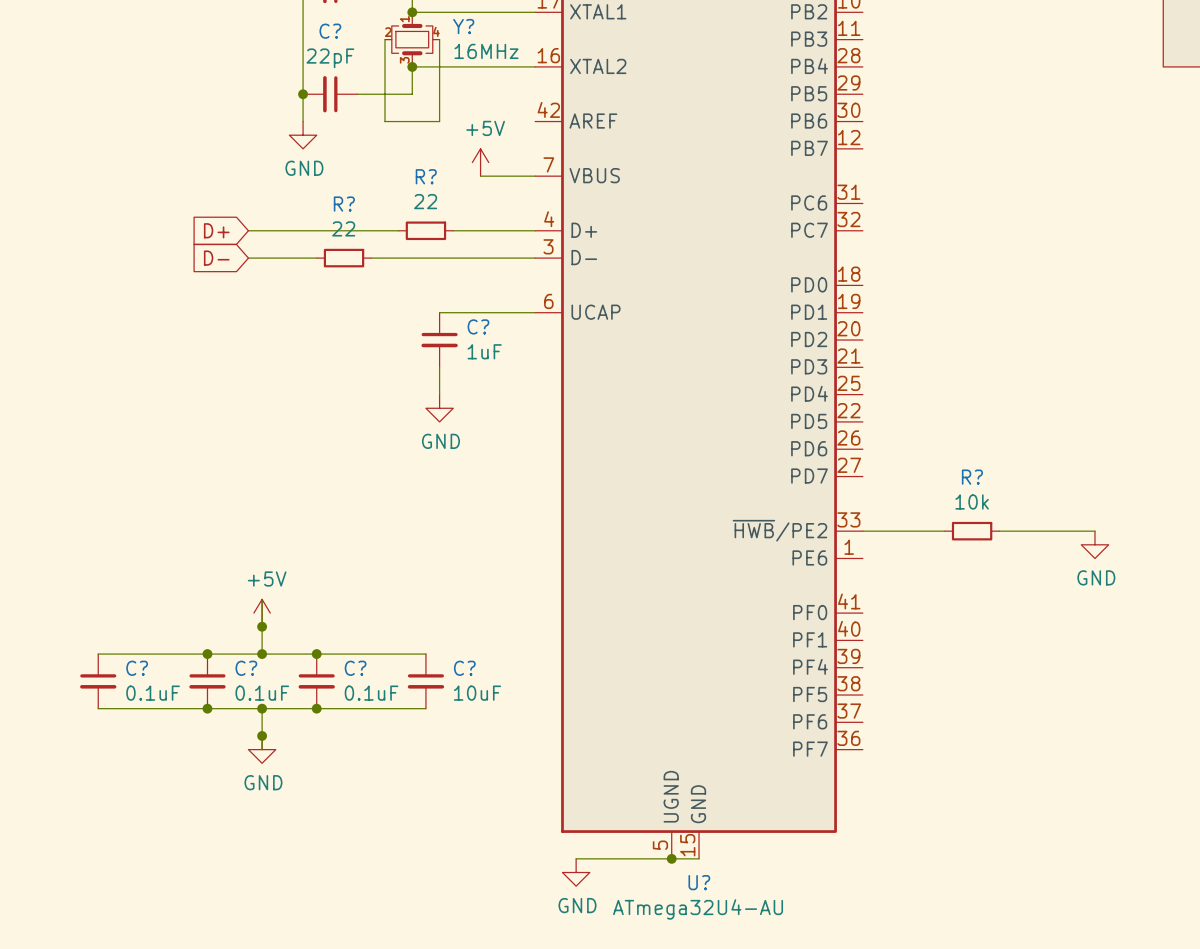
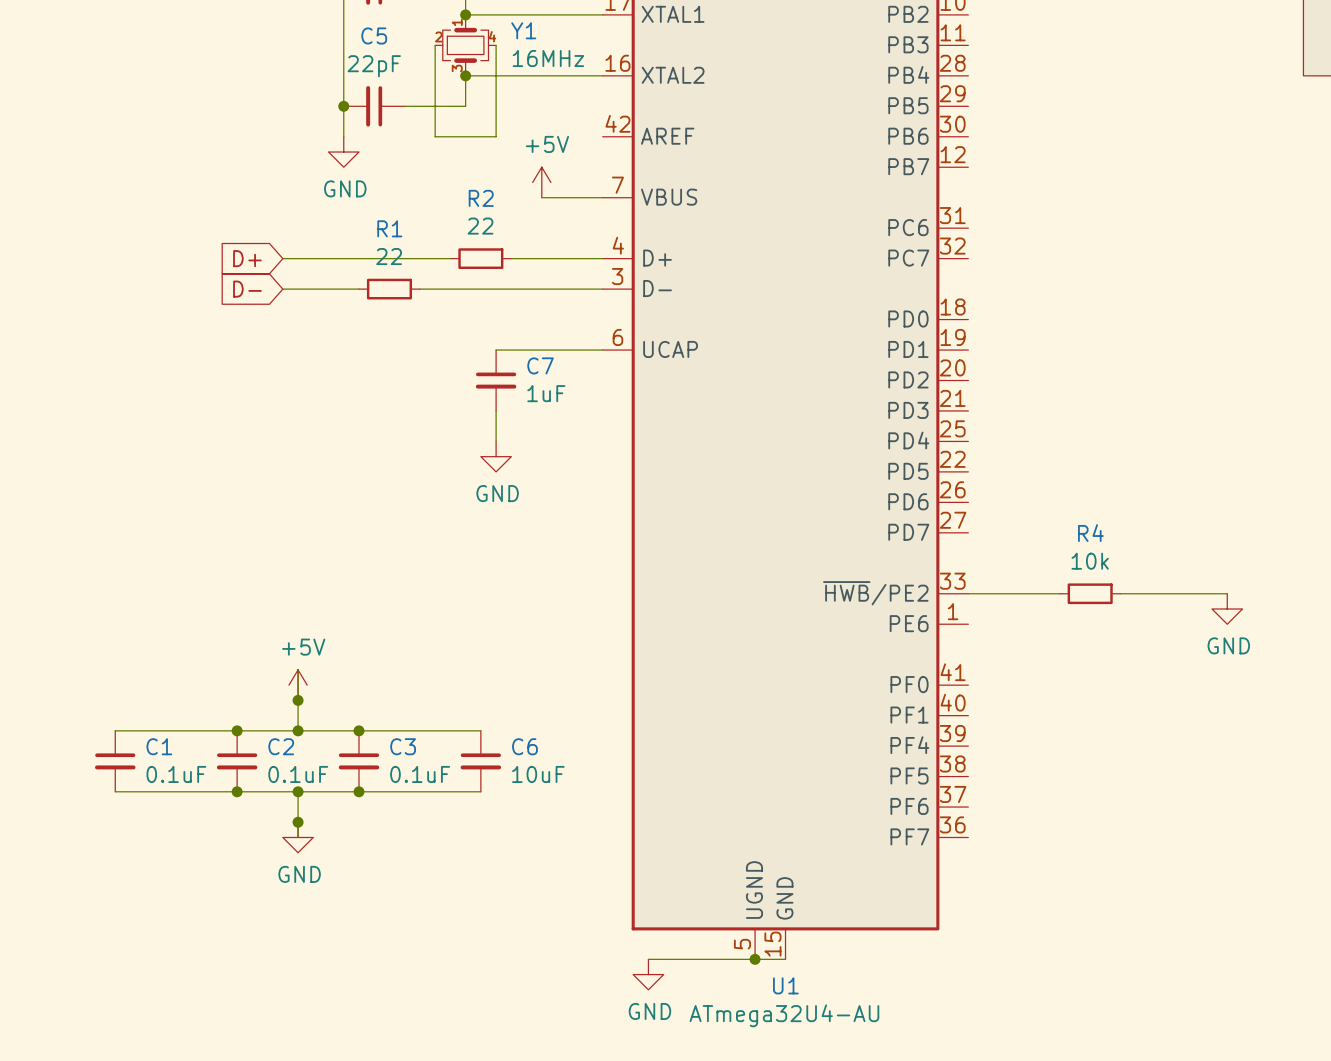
Y? name: Y? (463, 26) -> Y1 (523, 30)
C? name: C? (330, 31) -> C5 (374, 35)
R? name: R? (426, 176) -> R2 (481, 198)
R? name: R? (344, 204) -> R1 (389, 228)
C? name: C? (478, 326) -> C7 (540, 365)
R? name: R? (972, 477) -> R4 (1090, 533)
C? name: C? (137, 668) -> C1 (159, 746)
C? name: C? (246, 668) -> C2 (281, 746)
C? name: C? (355, 668) -> C3 (403, 746)
C? name: C? (464, 668) -> C6 (524, 746)
U? name: U? (699, 882) -> U1 (785, 985)

